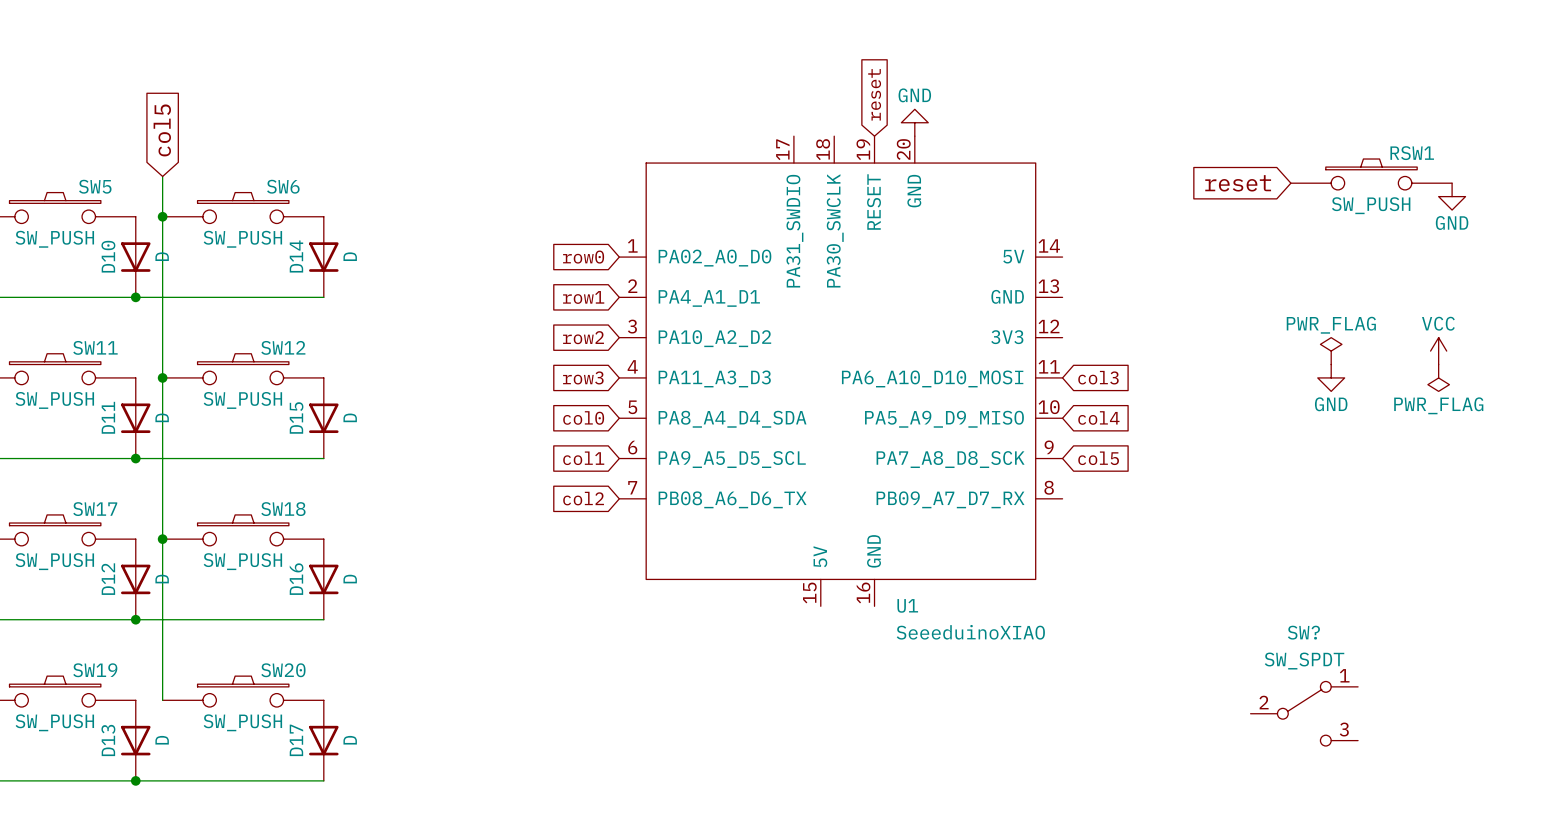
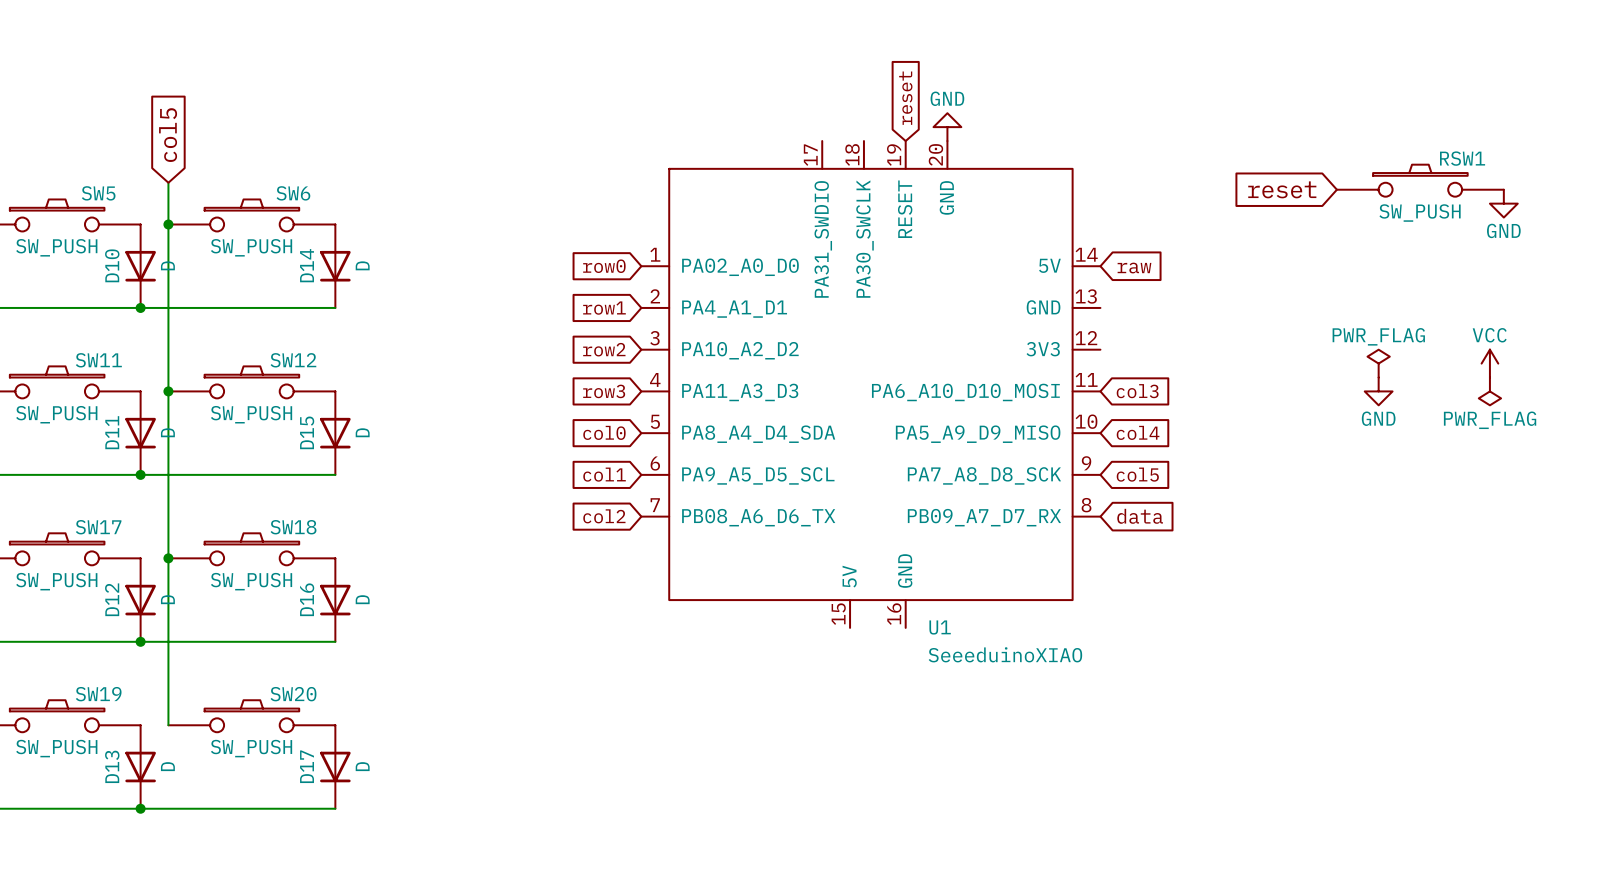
global label: none -> raw (1134, 268)
global label: none -> data (1140, 516)
SW?: SW_SPDT (1304, 713) -> none

